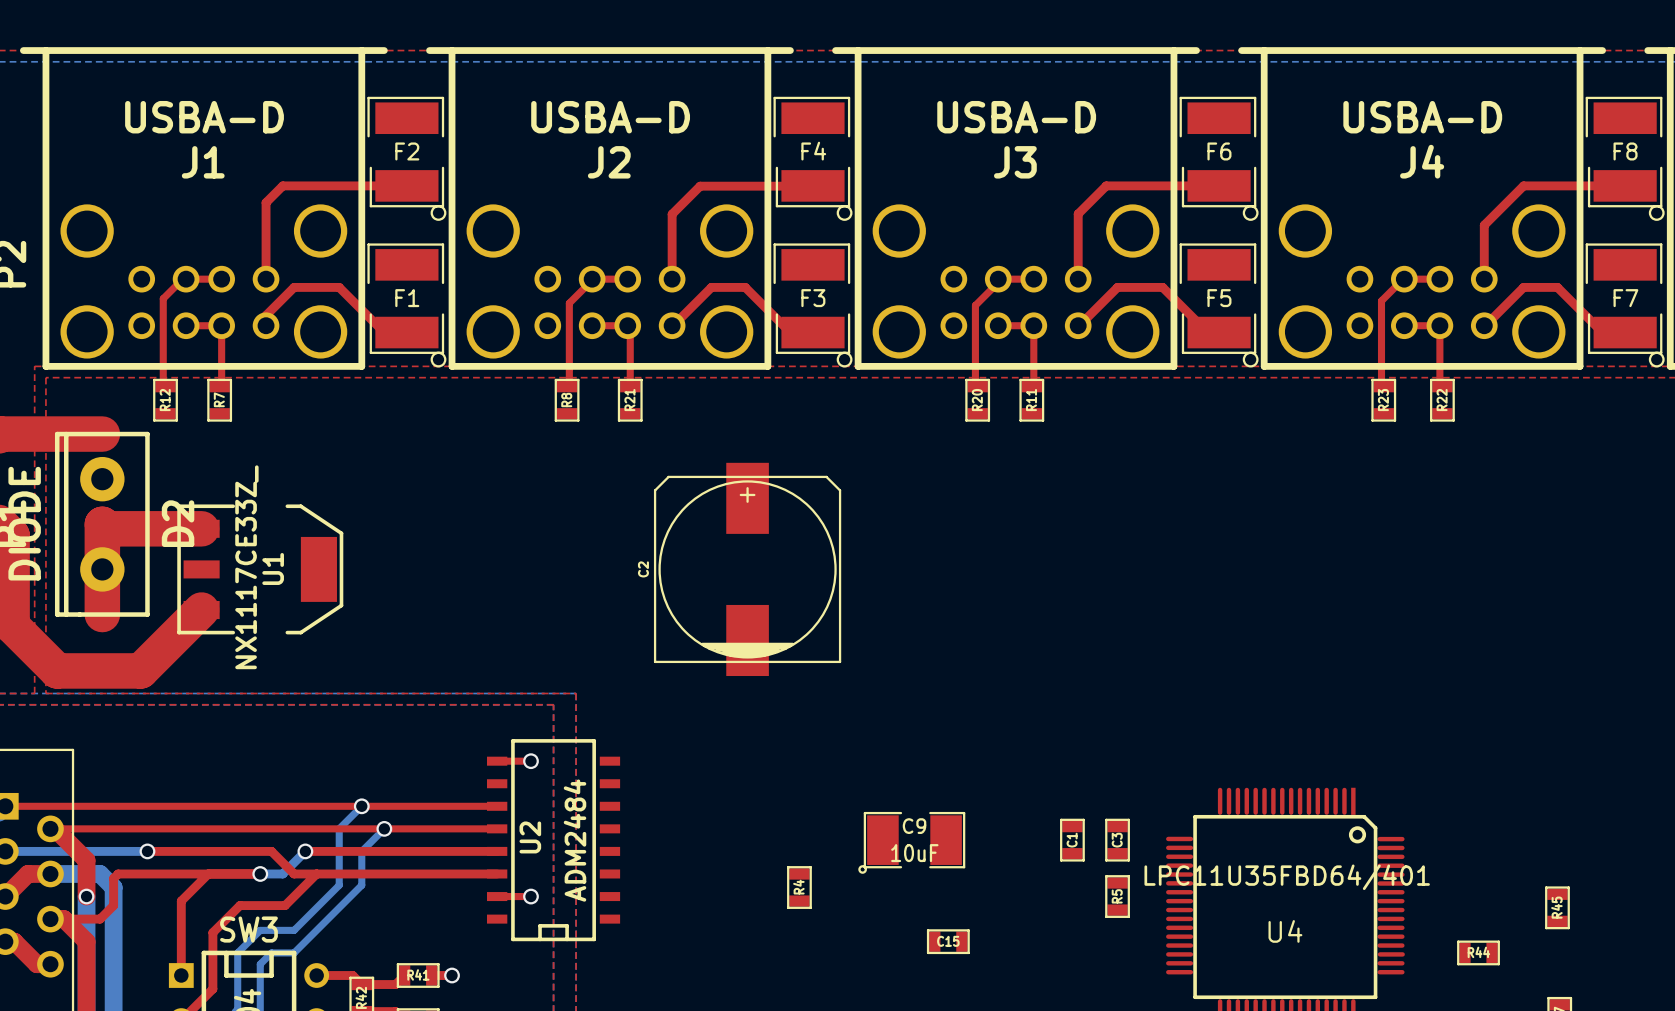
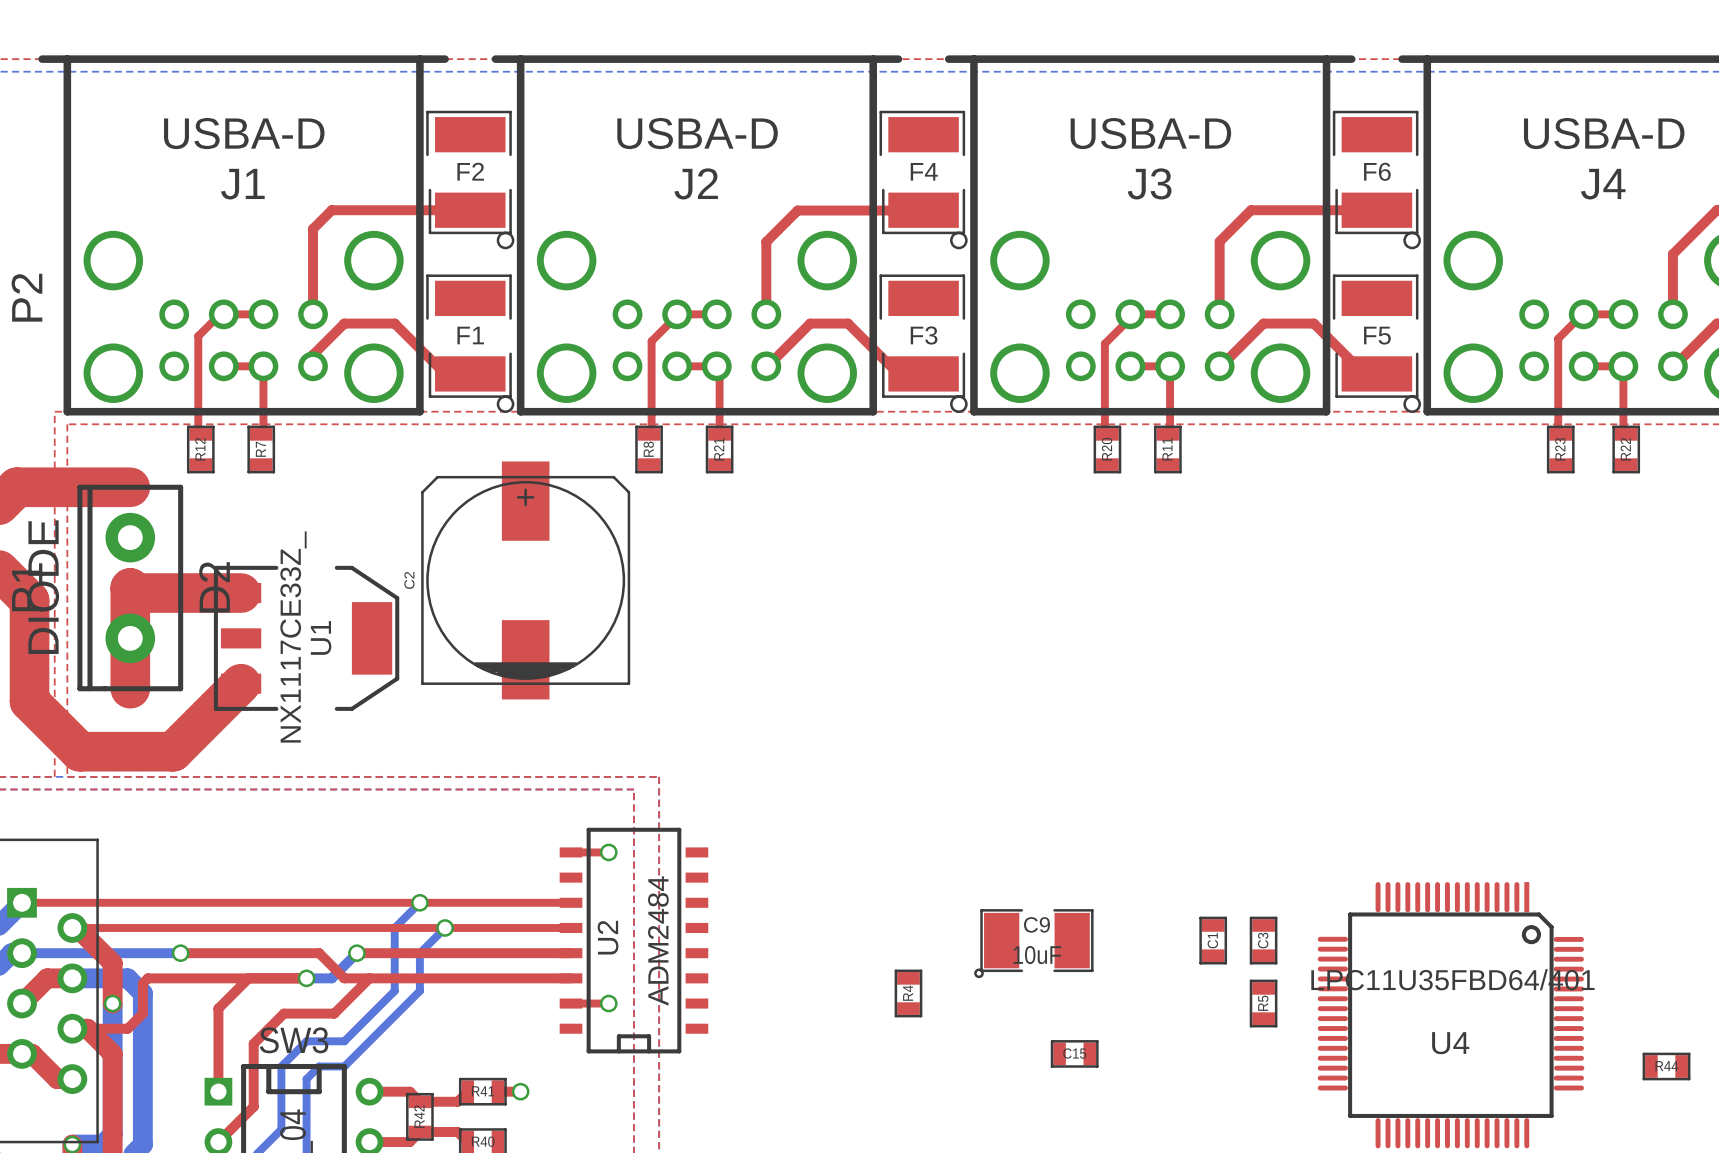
C2 position: (747, 569) -> (525, 580)

